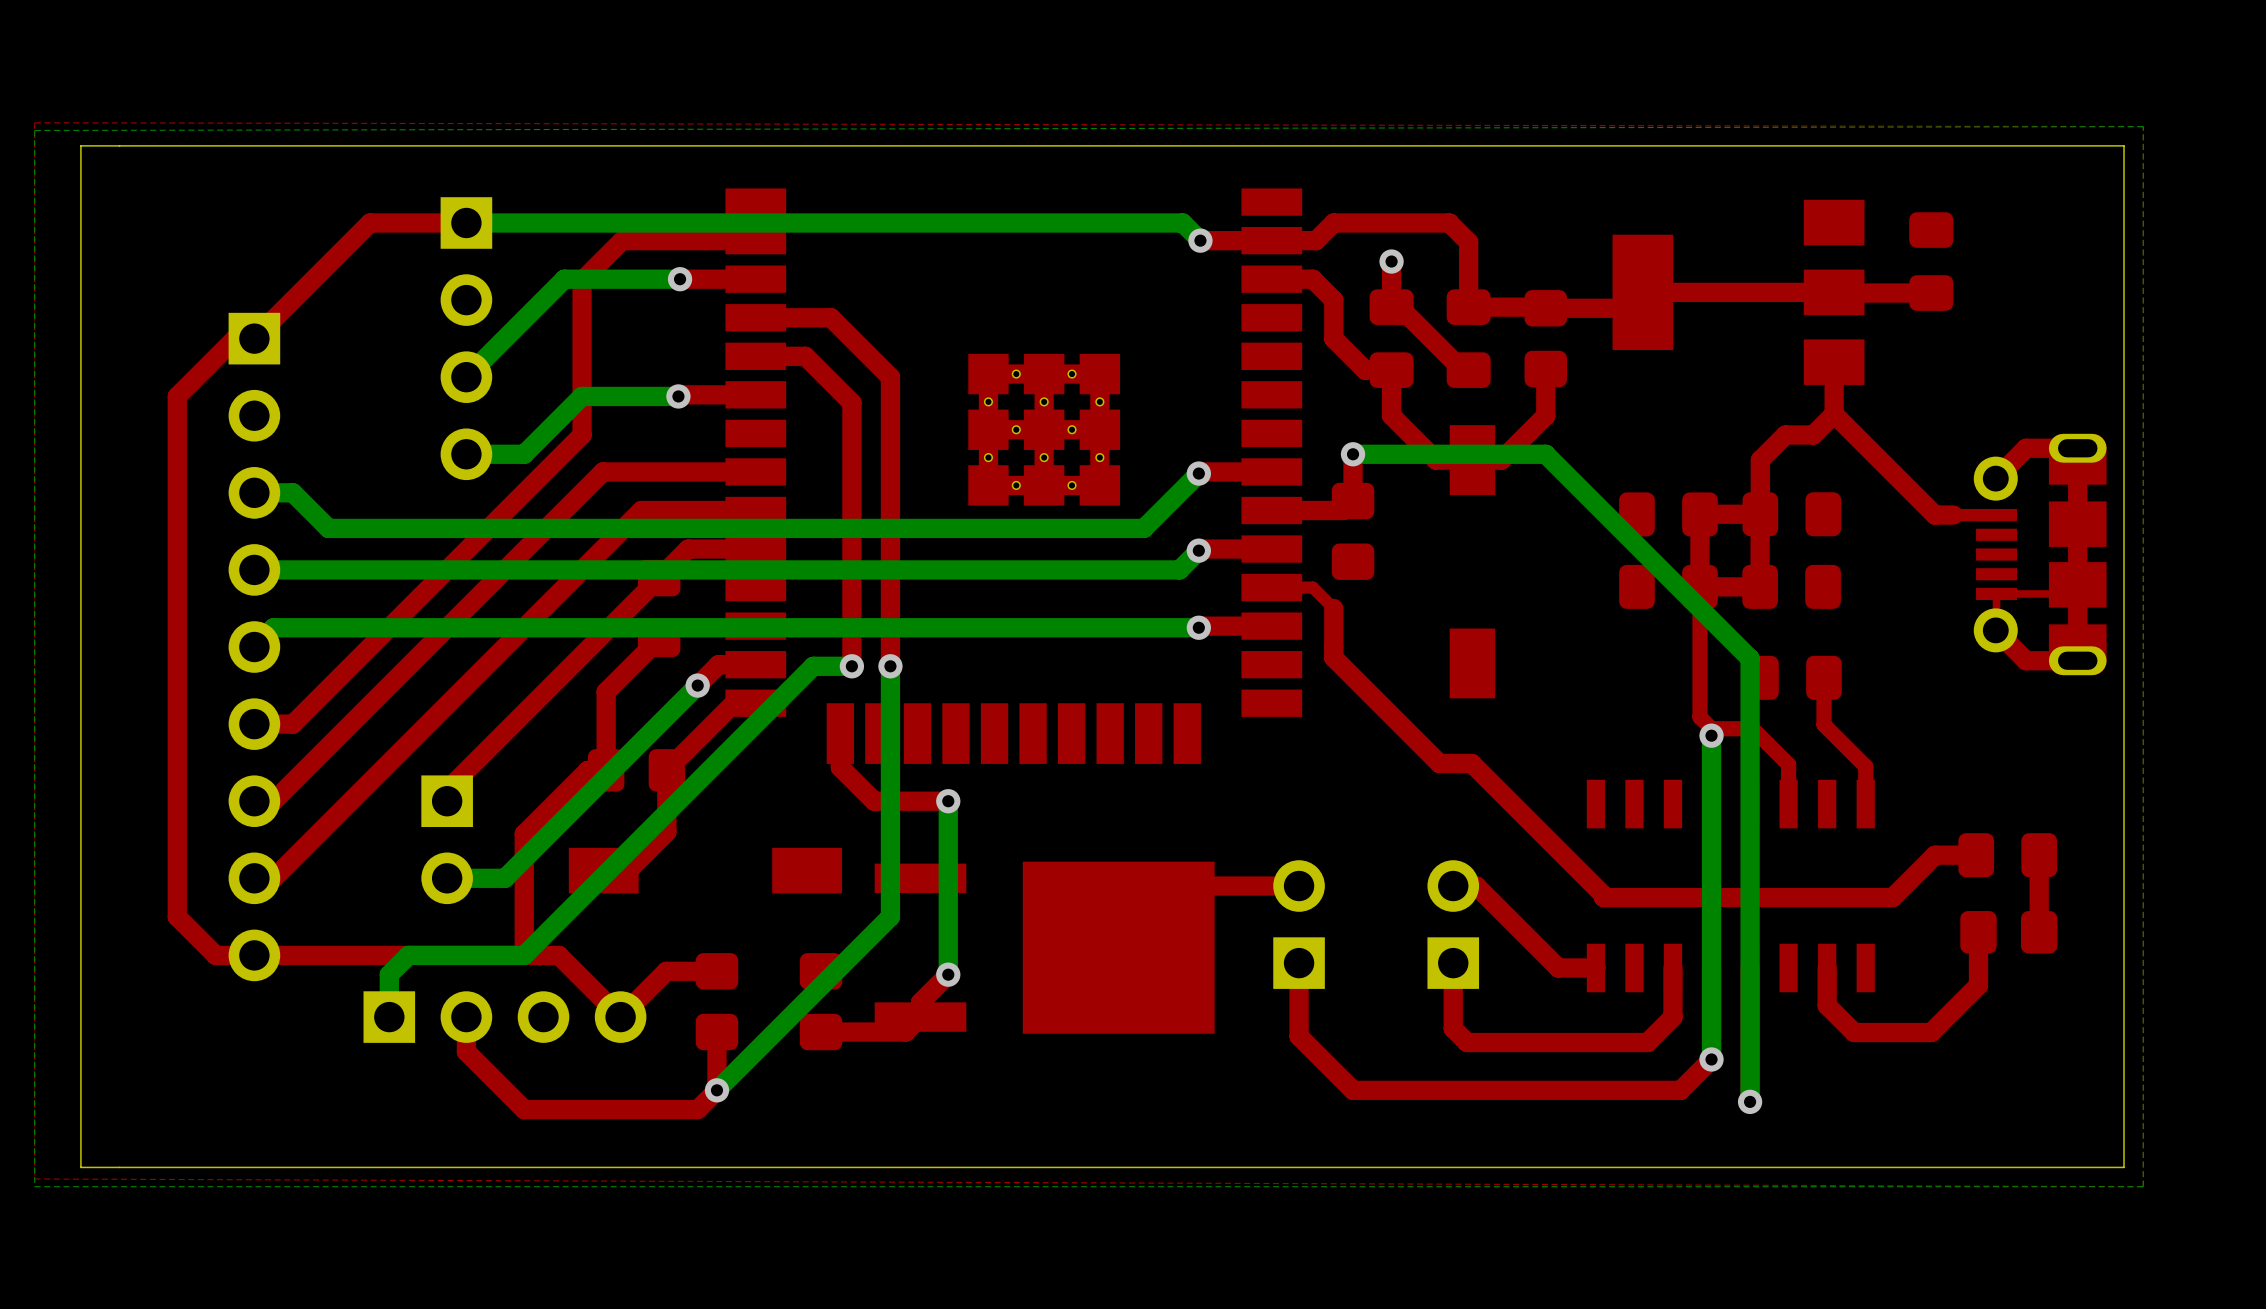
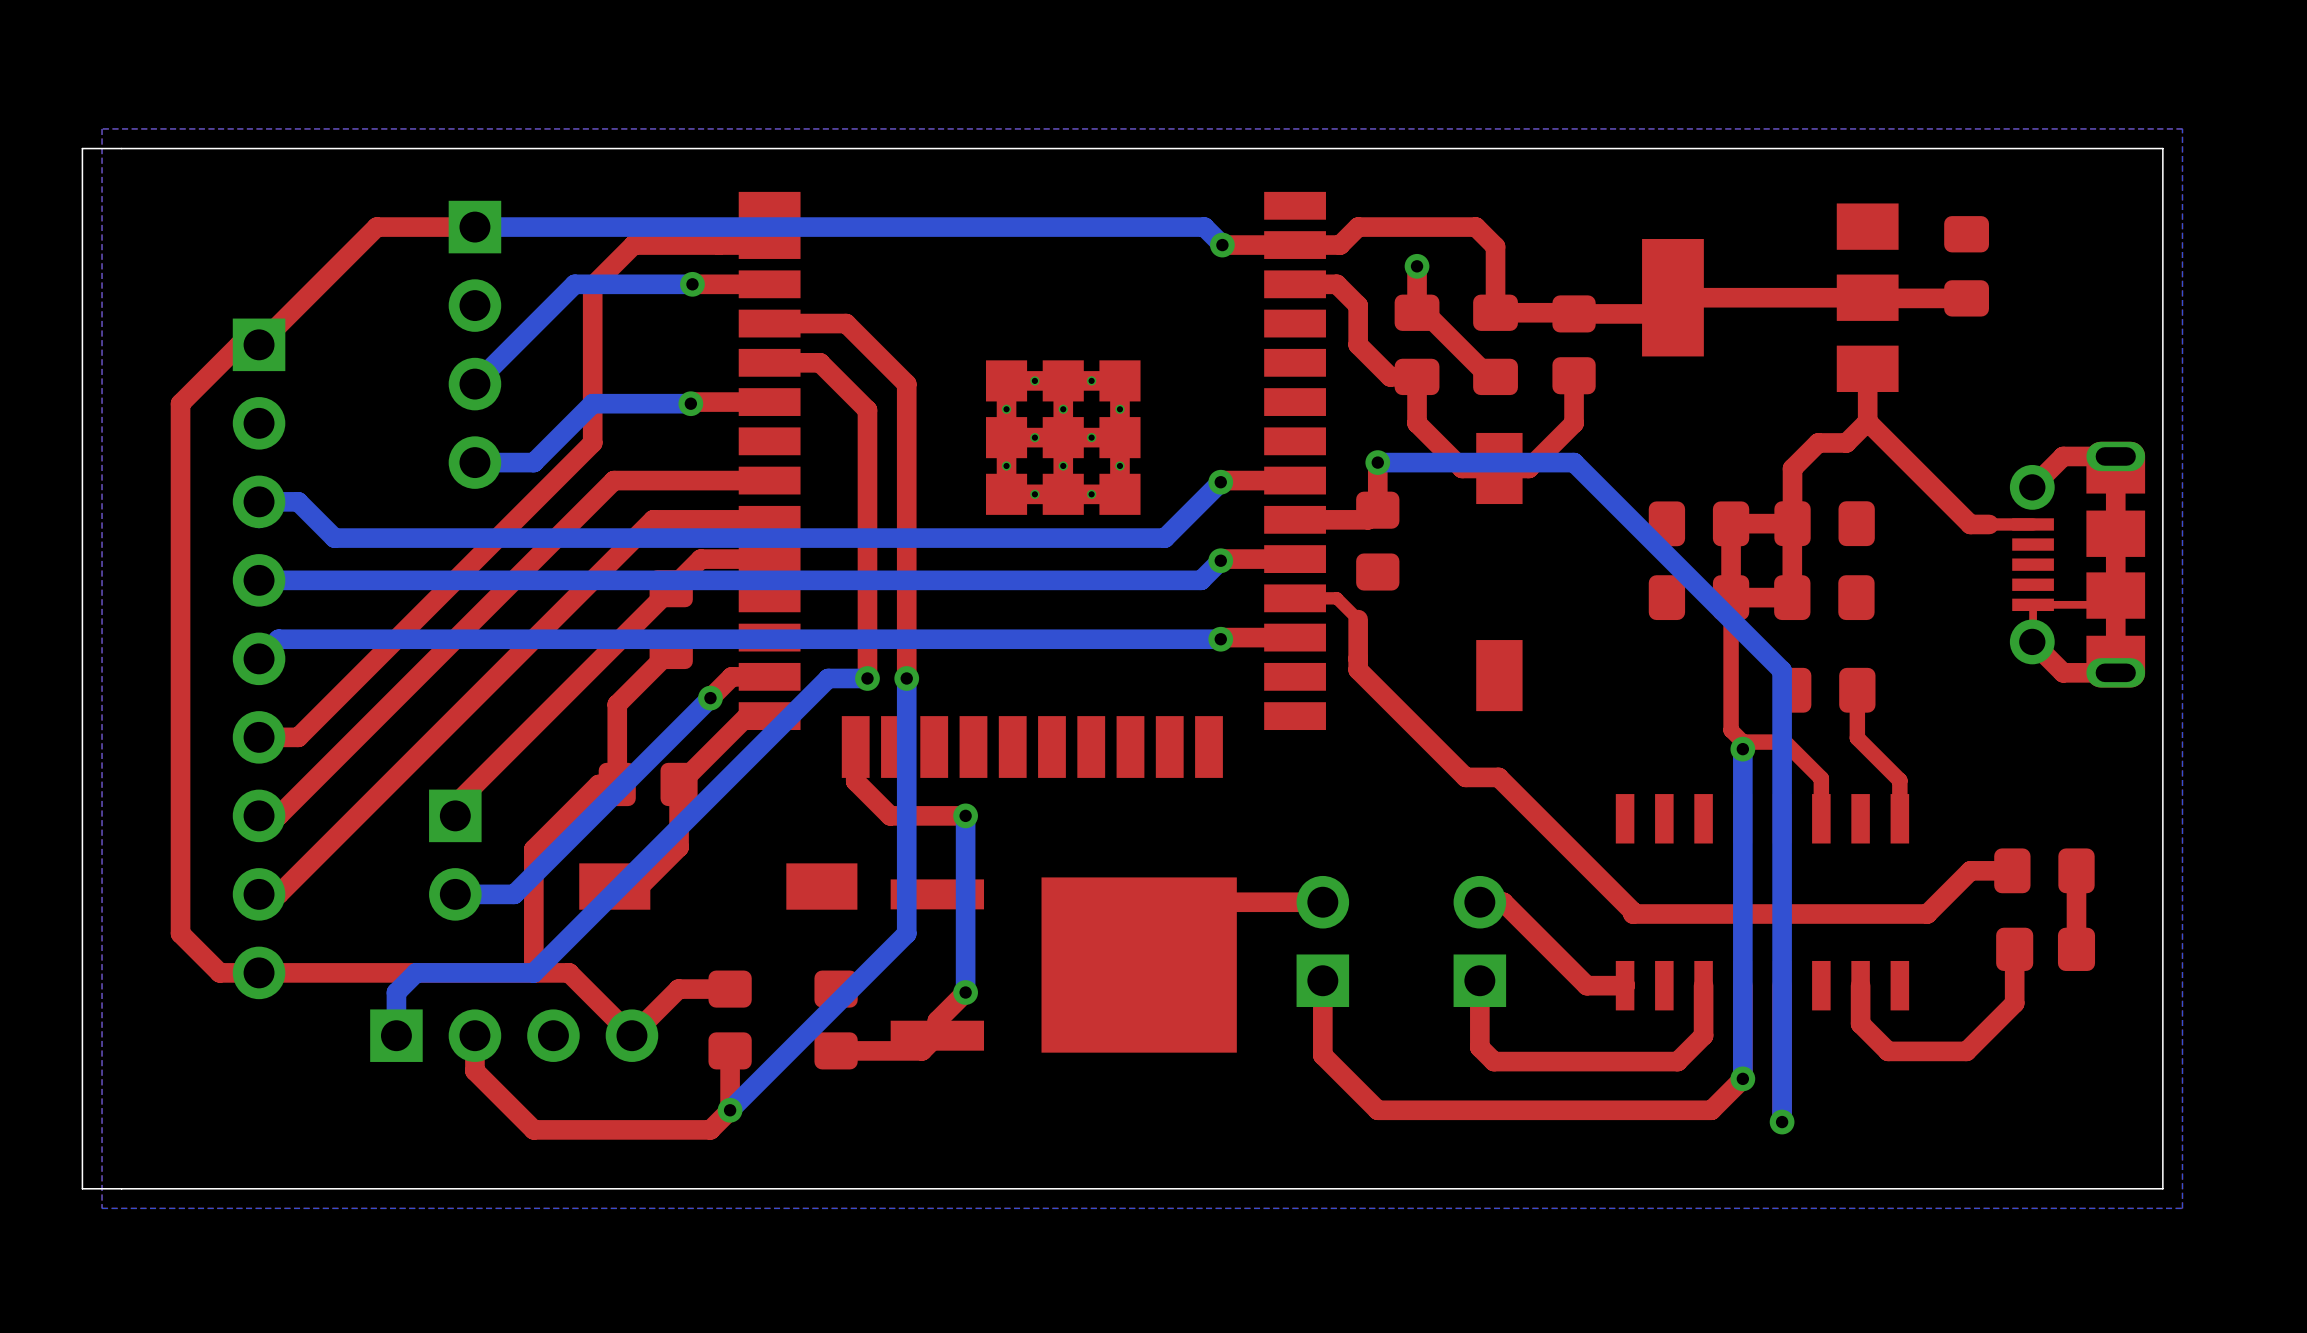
bottom zone outline: (2143, 126) (34, 130) (34, 1186) (100, 1186) -> (2182, 128) (102, 128) (102, 1208)
top zone outline: (2143, 126) (34, 122) (34, 1178) (2143, 1186) -> (2182, 128) (102, 128) (102, 1208) (2182, 1208)

